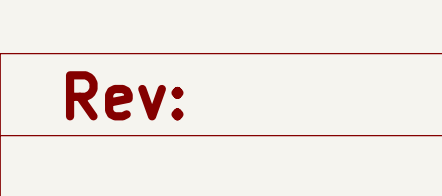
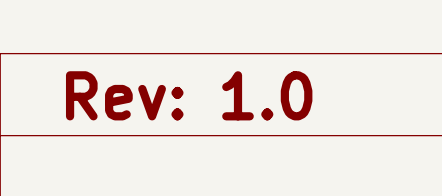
title block: Rev: (124, 95) -> Rev: 1.0 (189, 95)

